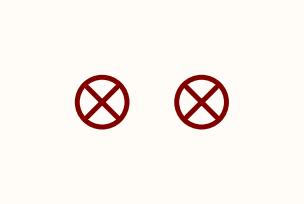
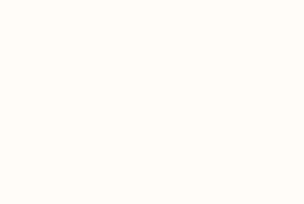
part: (102, 102) -> none
part: (201, 102) -> none

